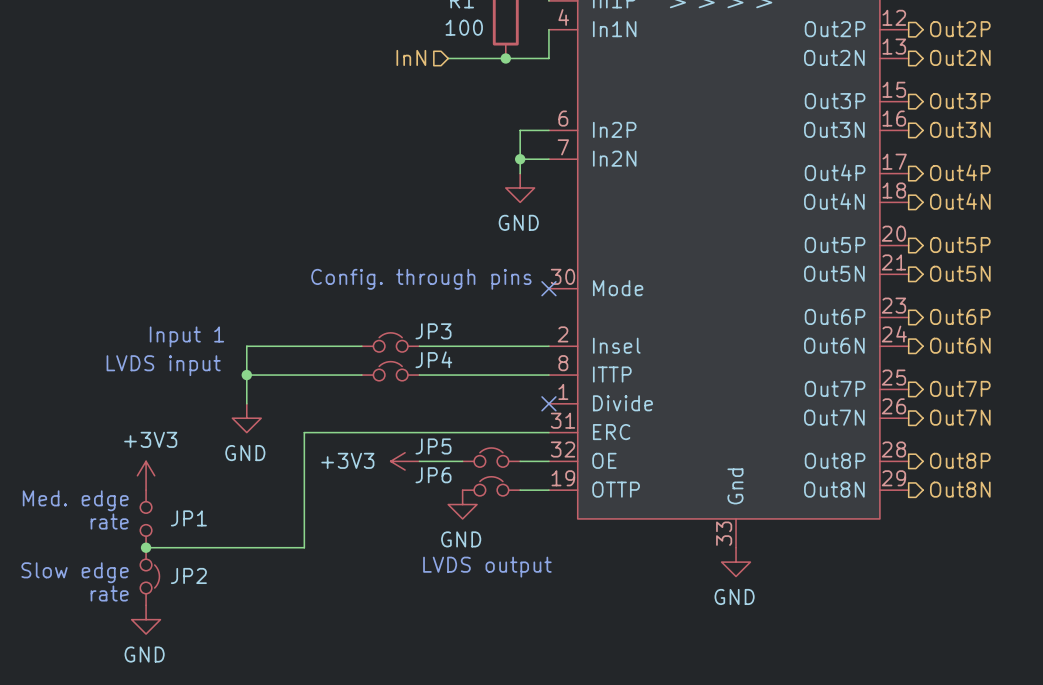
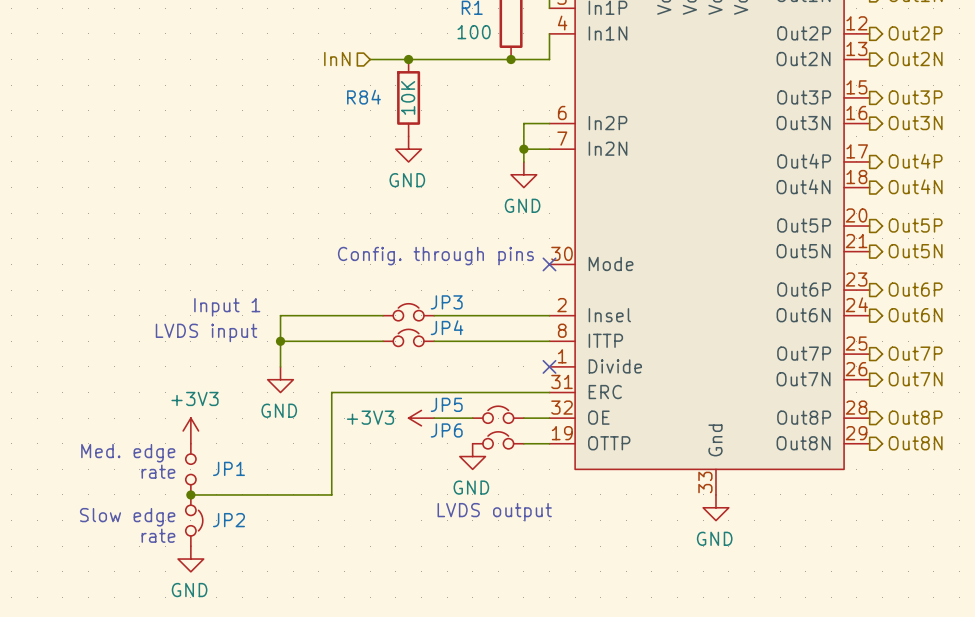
hierarchical label position: InN (411, 57) -> InN (337, 59)
wire: none -> (370, 59) (459, 59)
junction: none -> (408, 59)
R84: none -> 10K (408, 97)
power symbol: none -> GND (408, 149)

